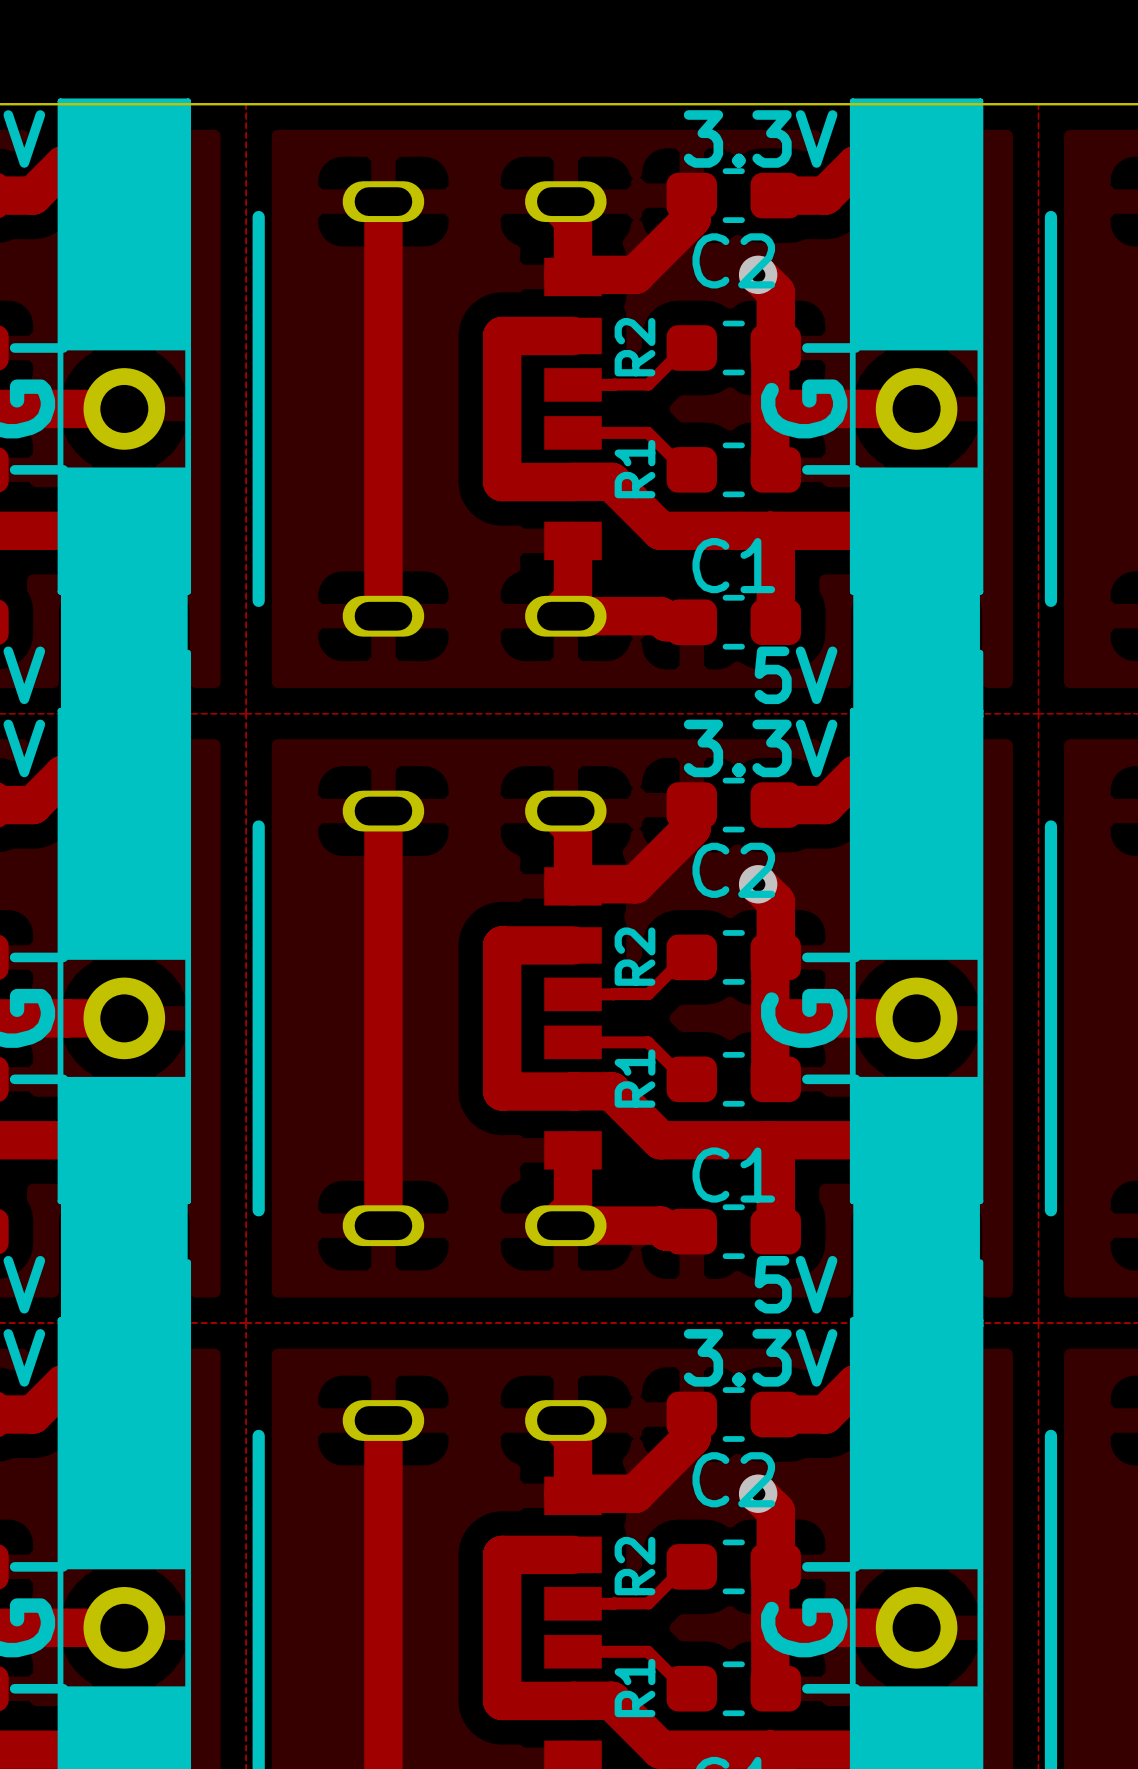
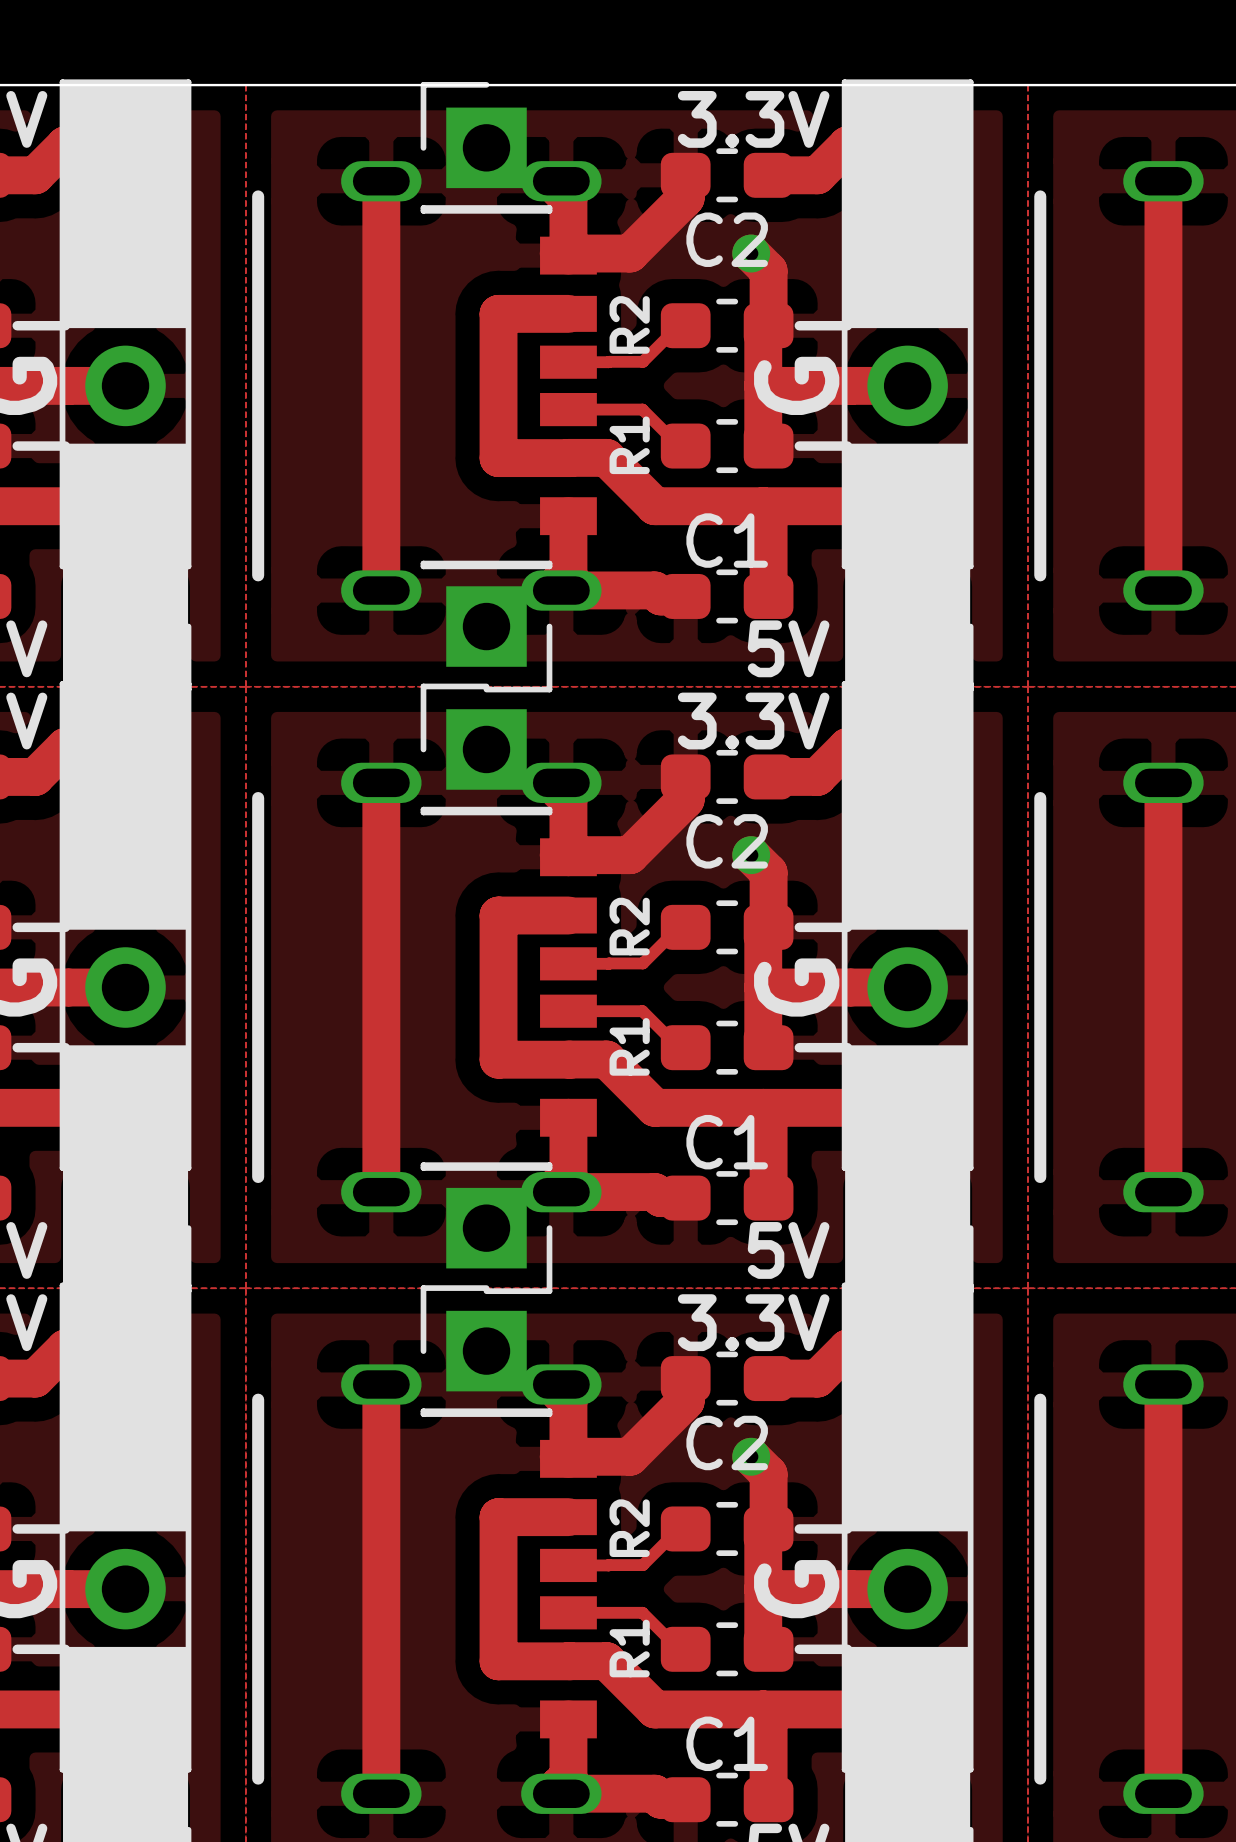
part: none -> (486, 147)
part: none -> (486, 626)
part: none -> (486, 749)
part: none -> (486, 1228)
part: none -> (486, 1351)

